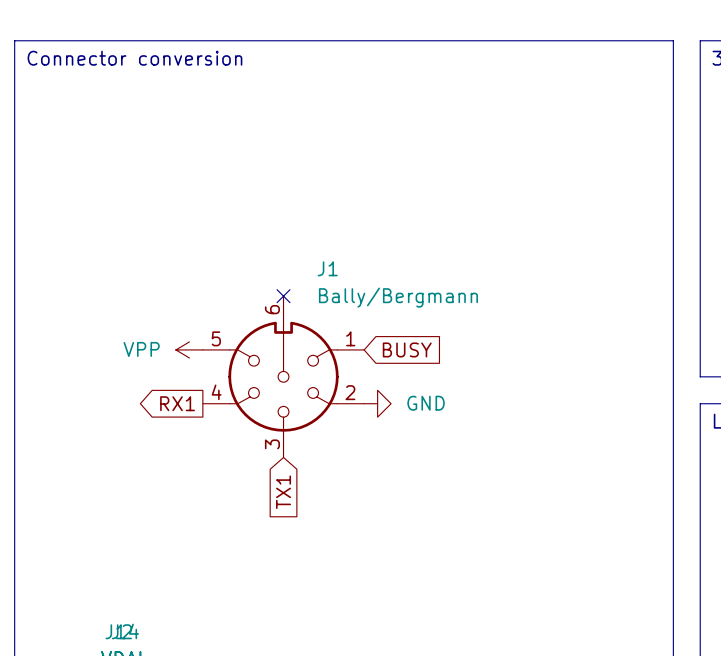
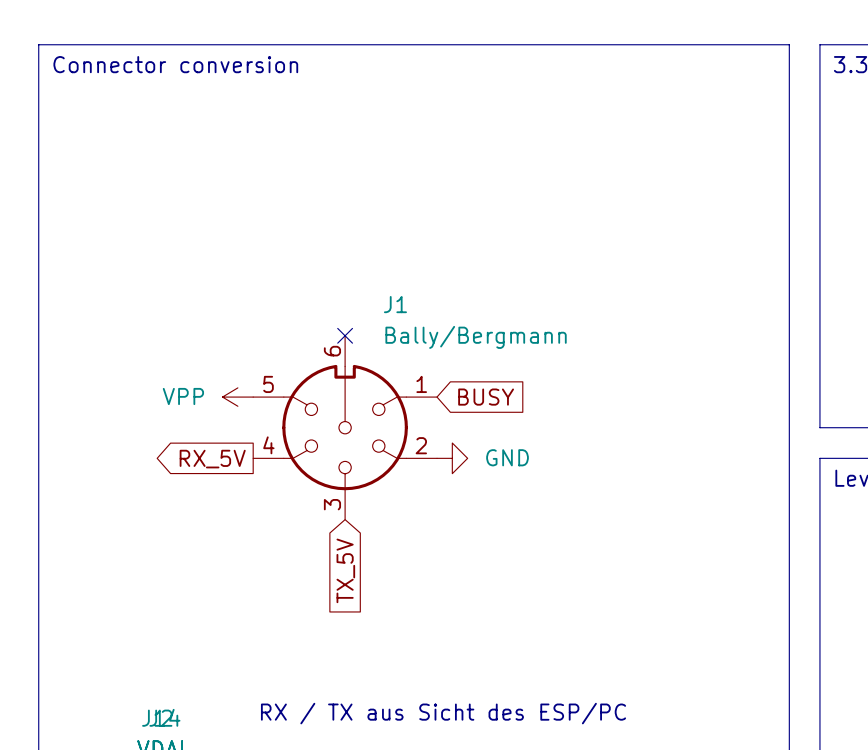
global label: RX1 (177, 403) -> RX_5V (212, 459)
global label: TX1 (283, 492) -> TX_5V (345, 570)
text: none -> RX / TX aus Sicht des ESP/PC (443, 713)

